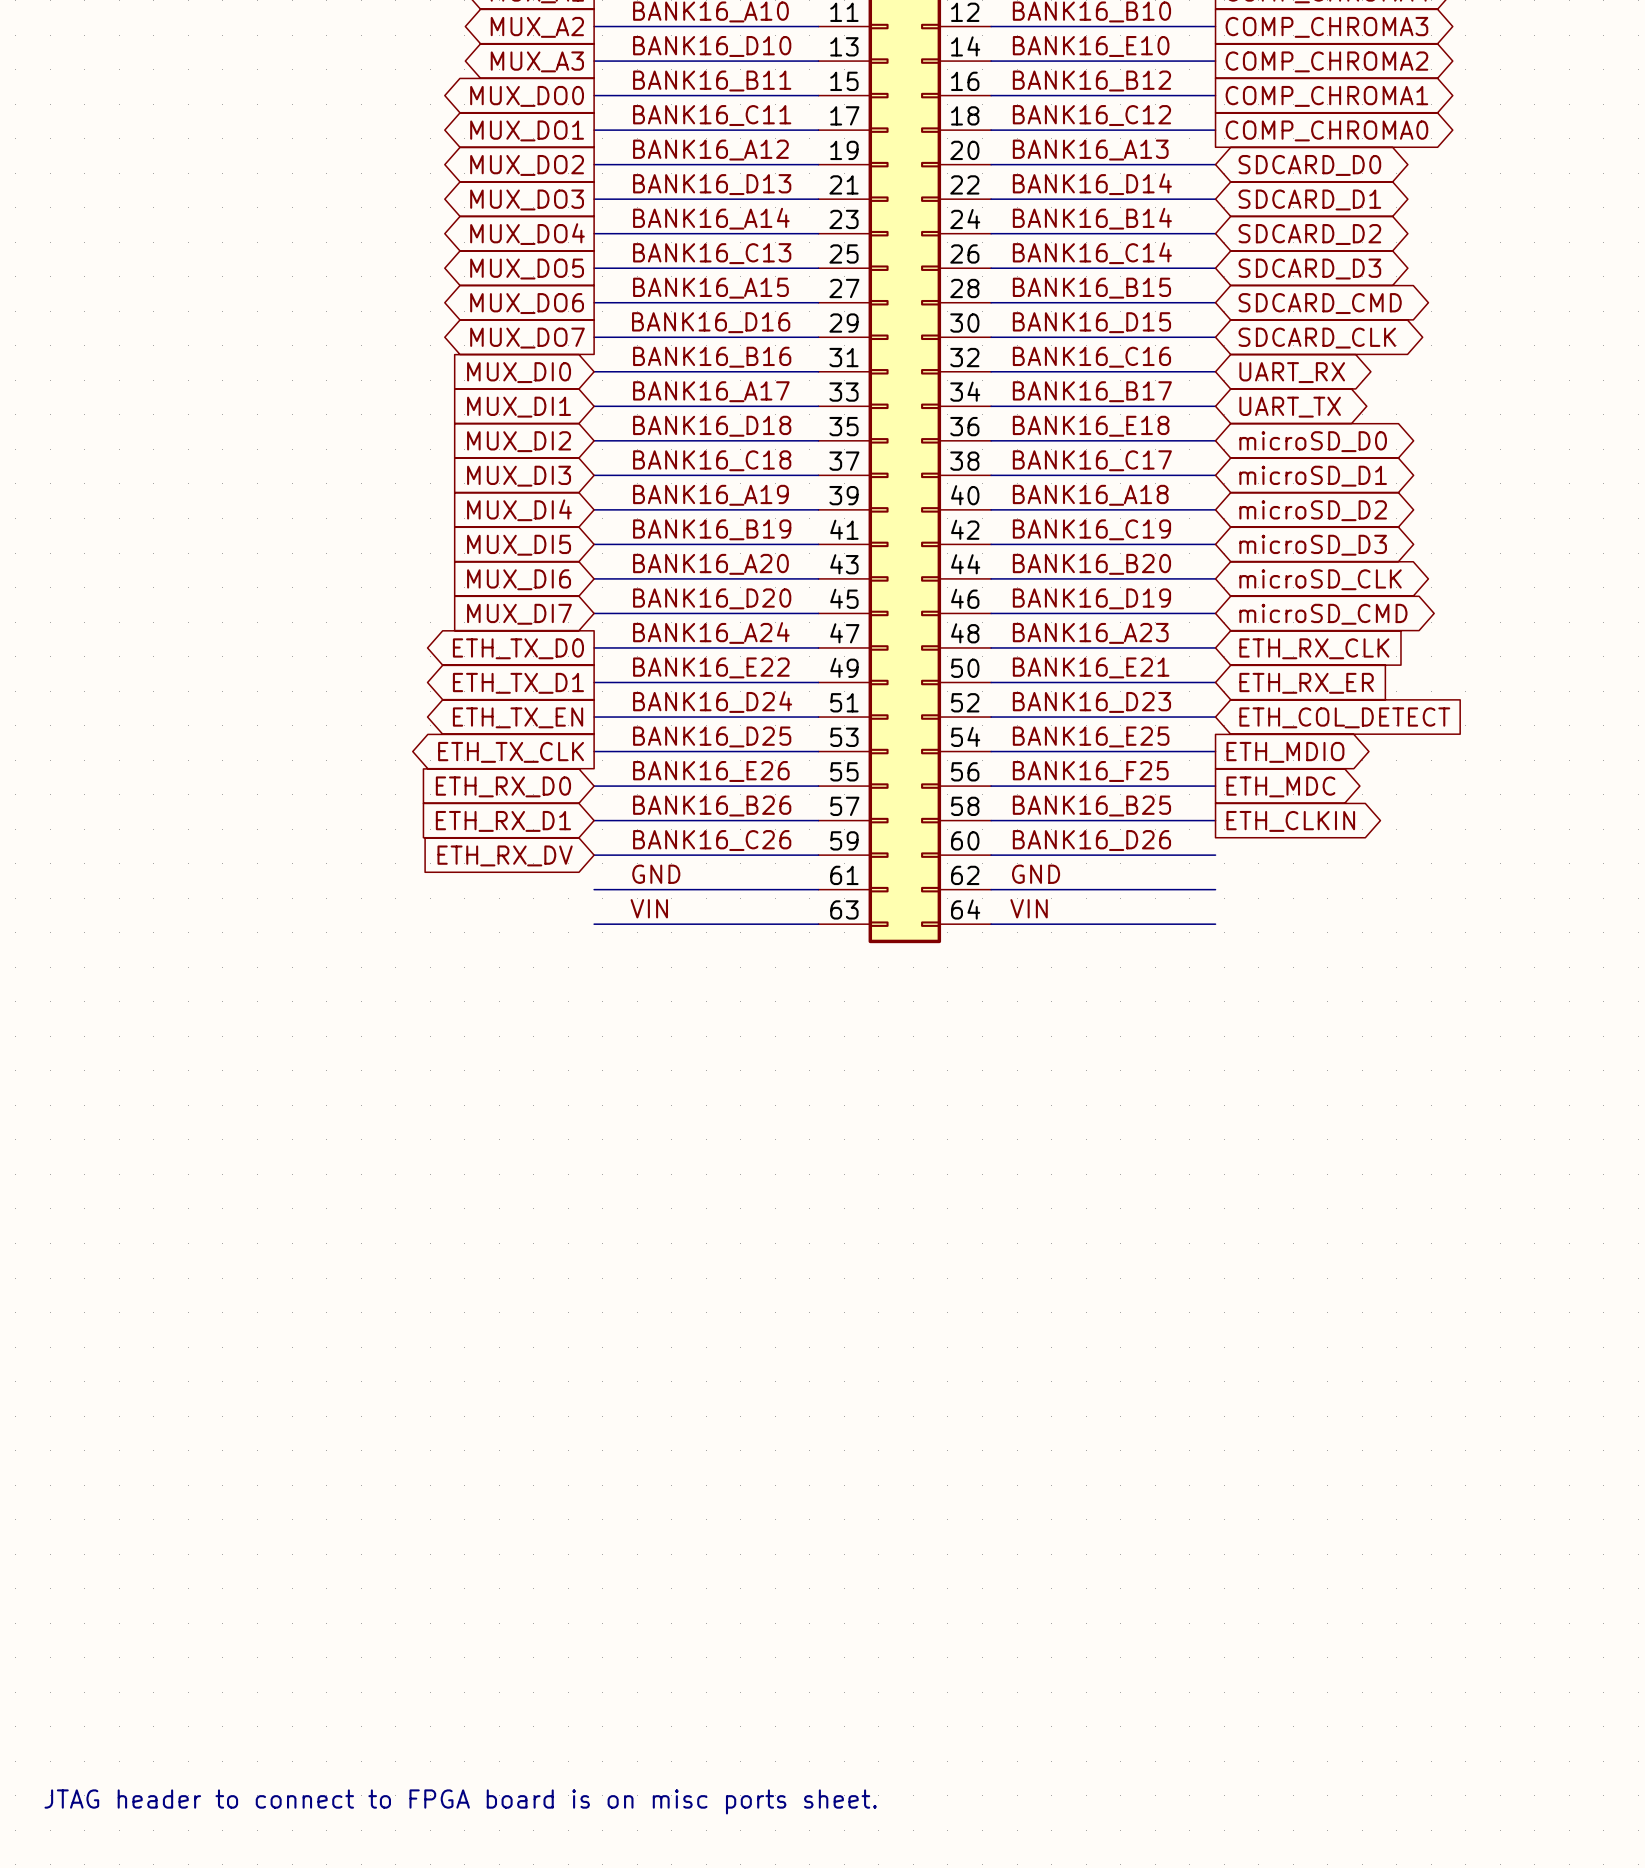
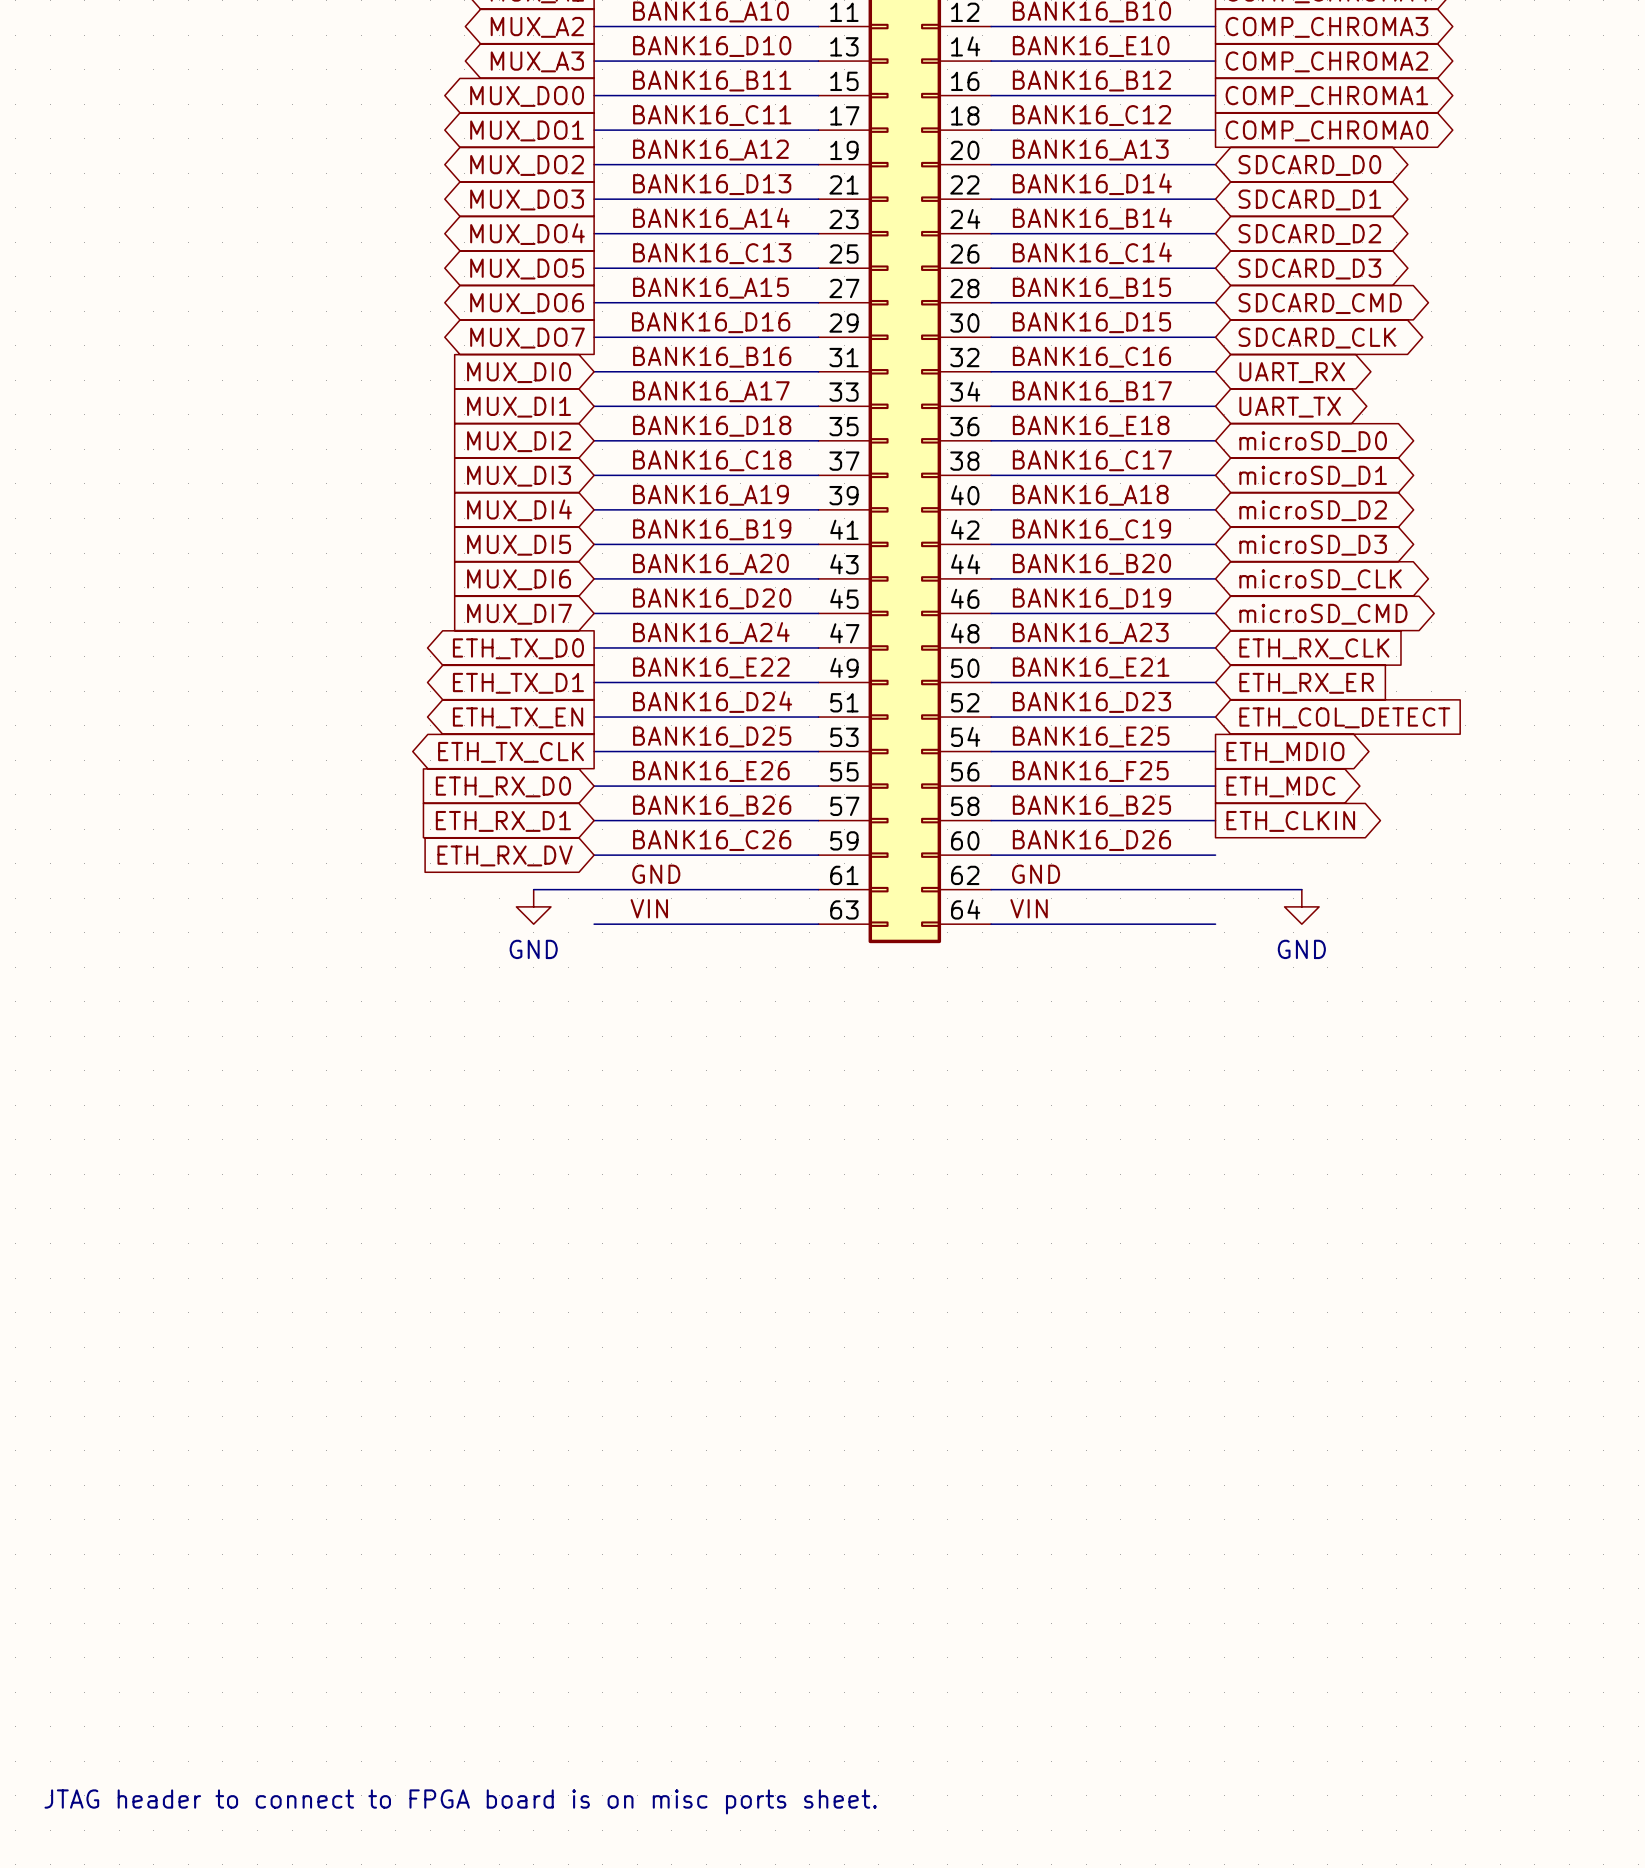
wire: none -> (533, 889) (594, 889)
wire: none -> (1215, 889) (1301, 889)
power symbol: none -> GND (533, 906)
power symbol: none -> GND (1301, 906)

